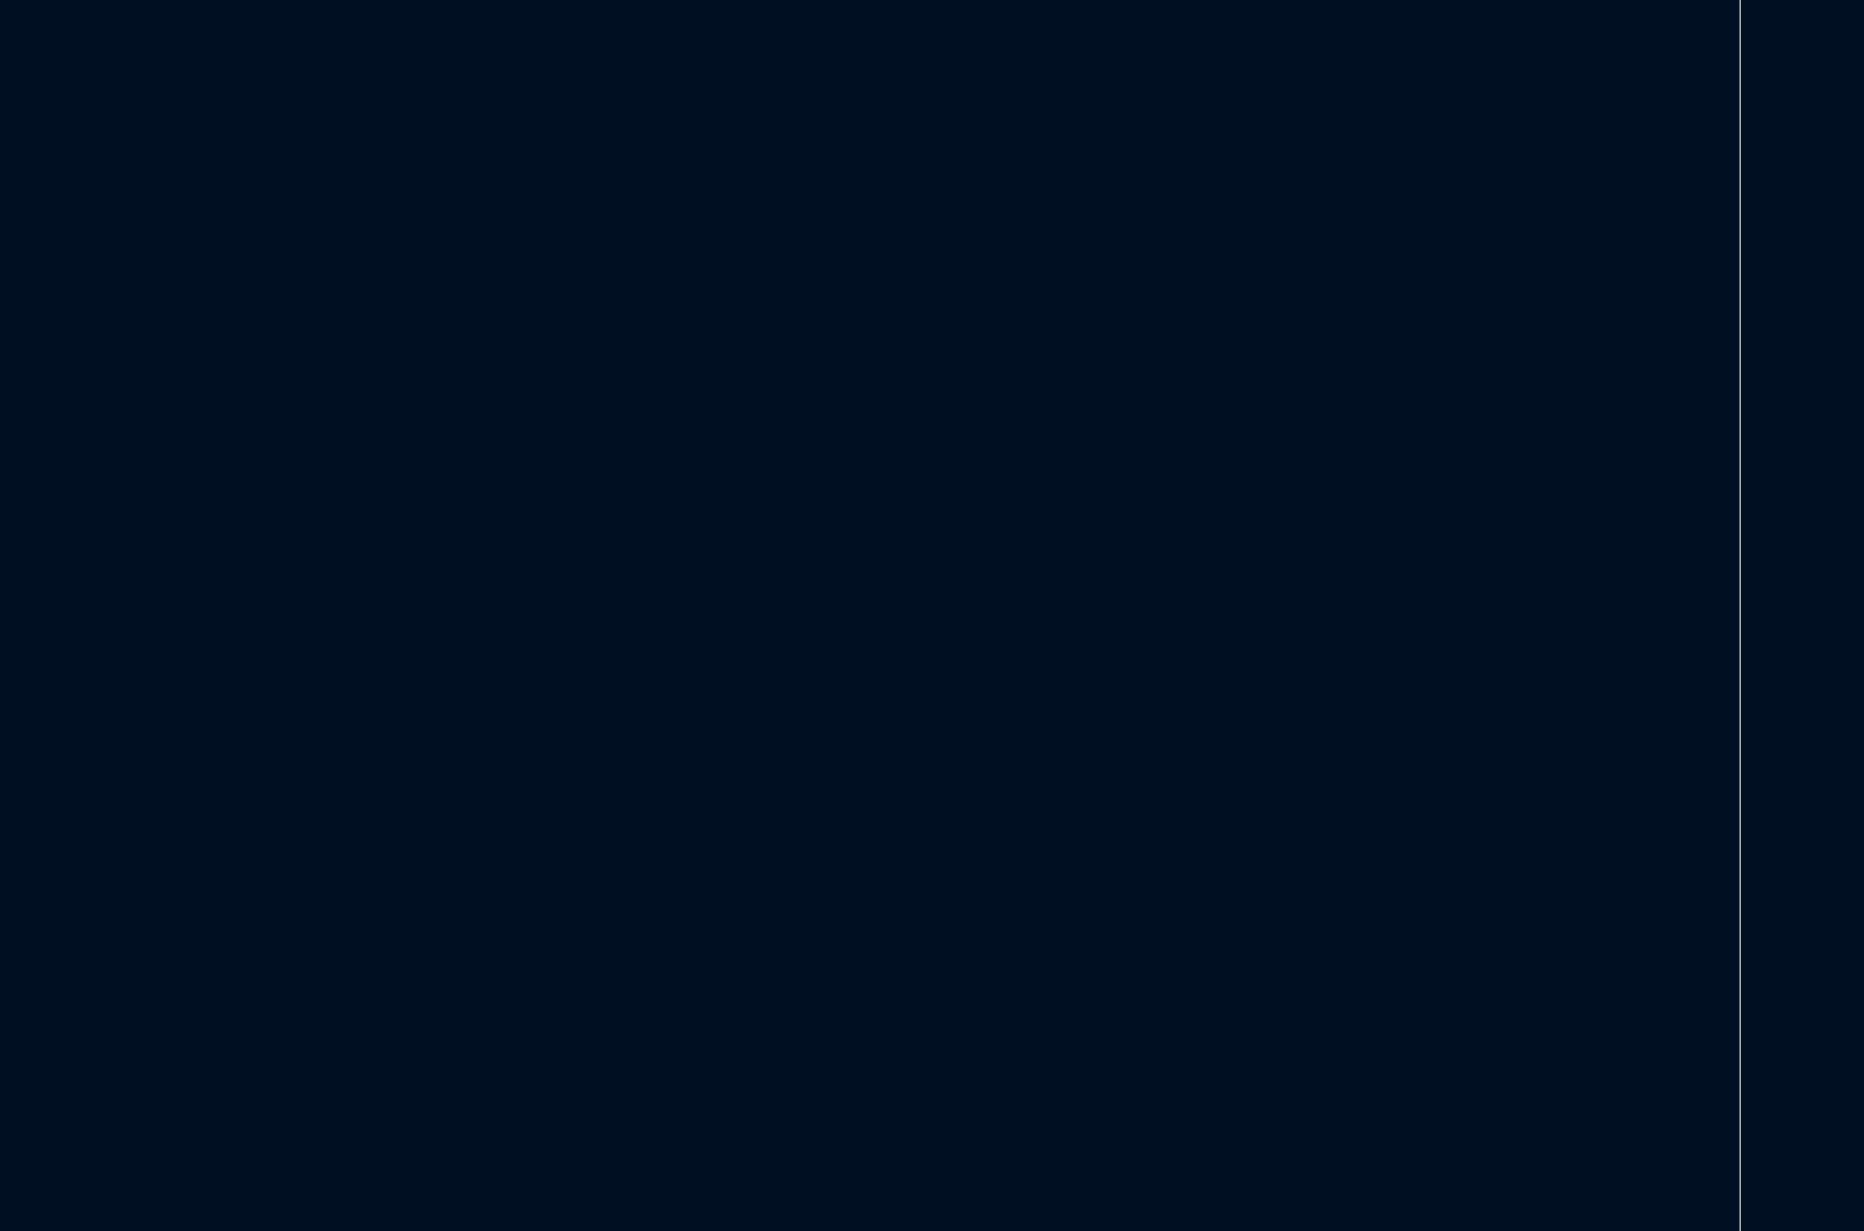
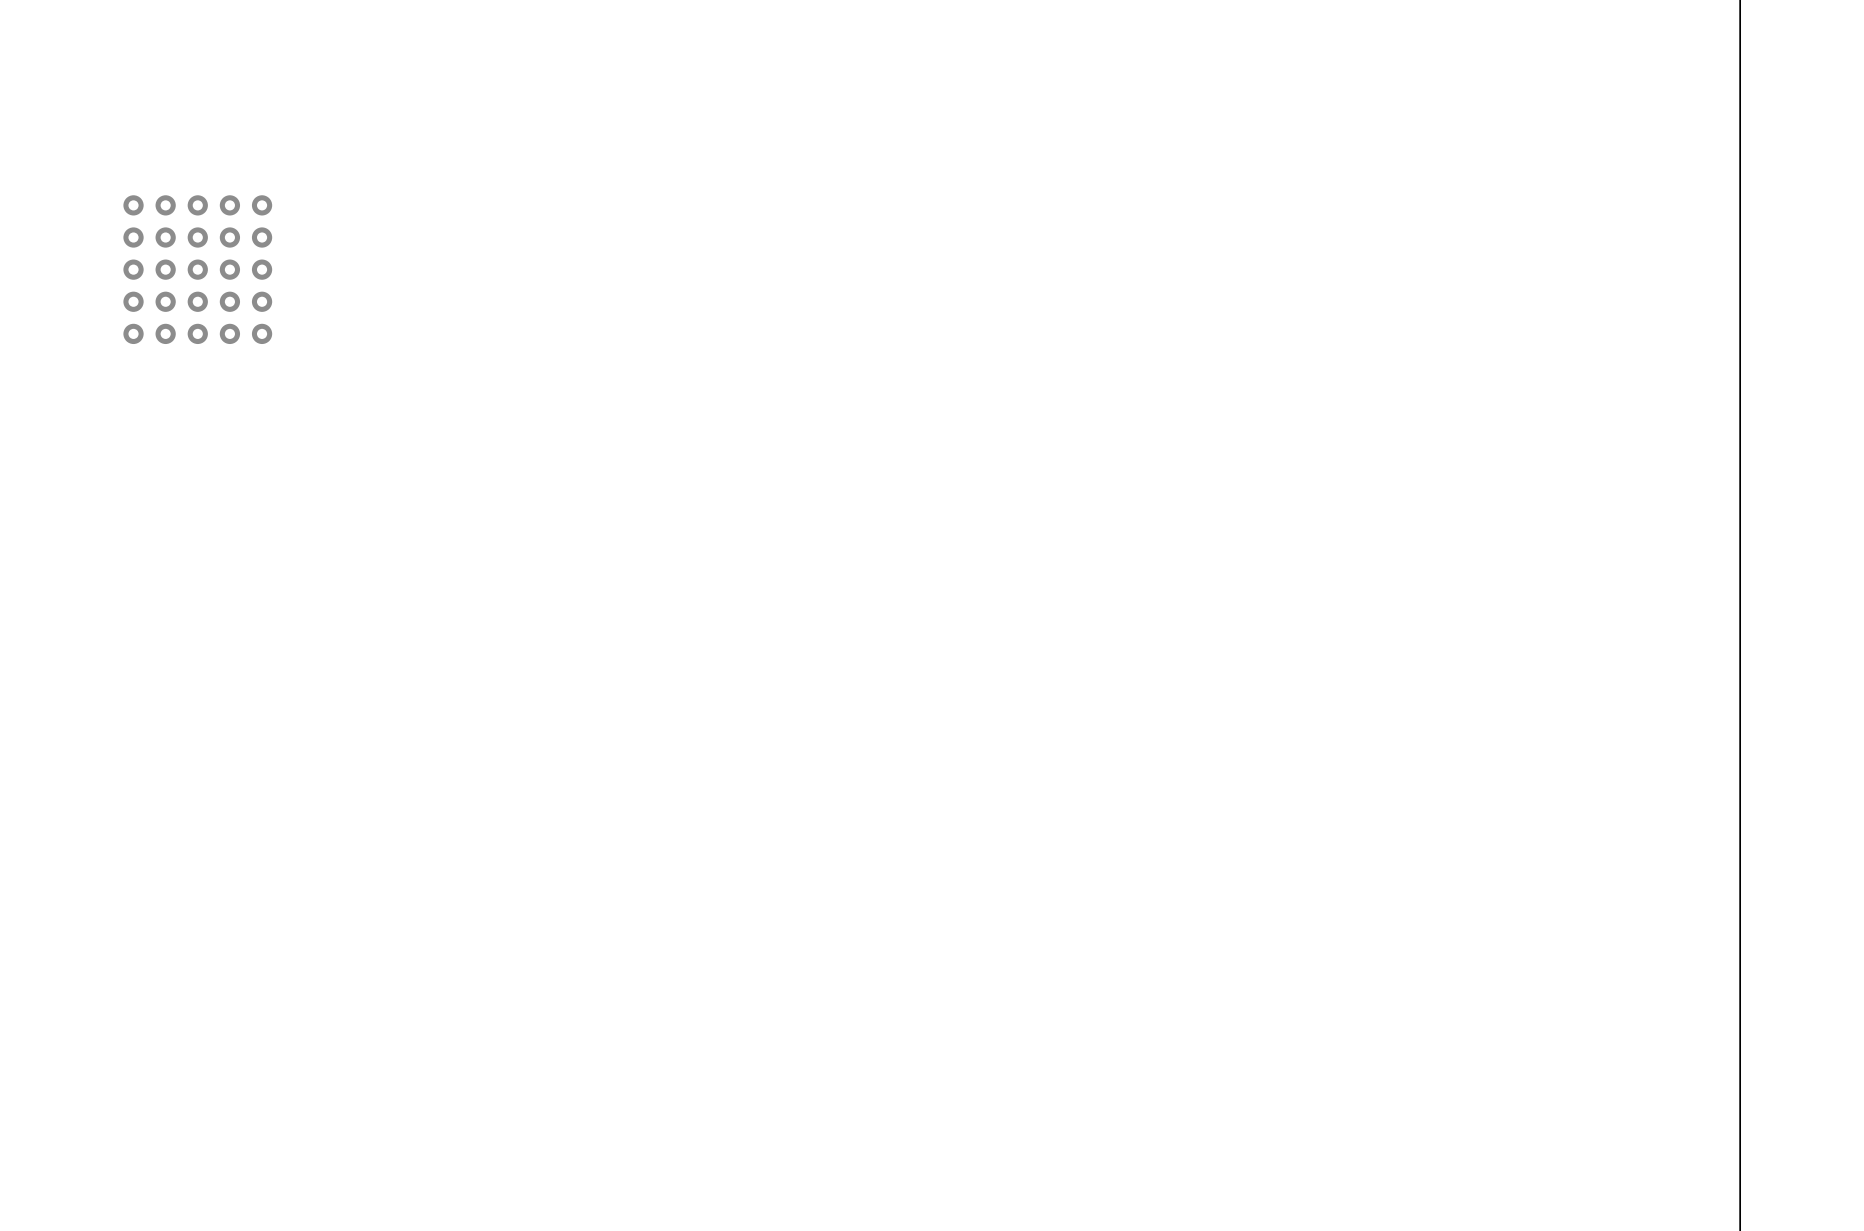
via: none -> (133, 205)
via: none -> (165, 205)
via: none -> (197, 205)
via: none -> (229, 205)
via: none -> (262, 205)
via: none -> (133, 237)
via: none -> (165, 237)
via: none -> (197, 237)
via: none -> (229, 237)
via: none -> (262, 237)
via: none -> (133, 269)
via: none -> (165, 269)
via: none -> (197, 269)
via: none -> (229, 269)
via: none -> (262, 269)
via: none -> (133, 301)
via: none -> (165, 301)
via: none -> (197, 301)
via: none -> (229, 301)
via: none -> (262, 301)
via: none -> (133, 333)
via: none -> (165, 333)
via: none -> (197, 333)
via: none -> (229, 333)
via: none -> (262, 333)

